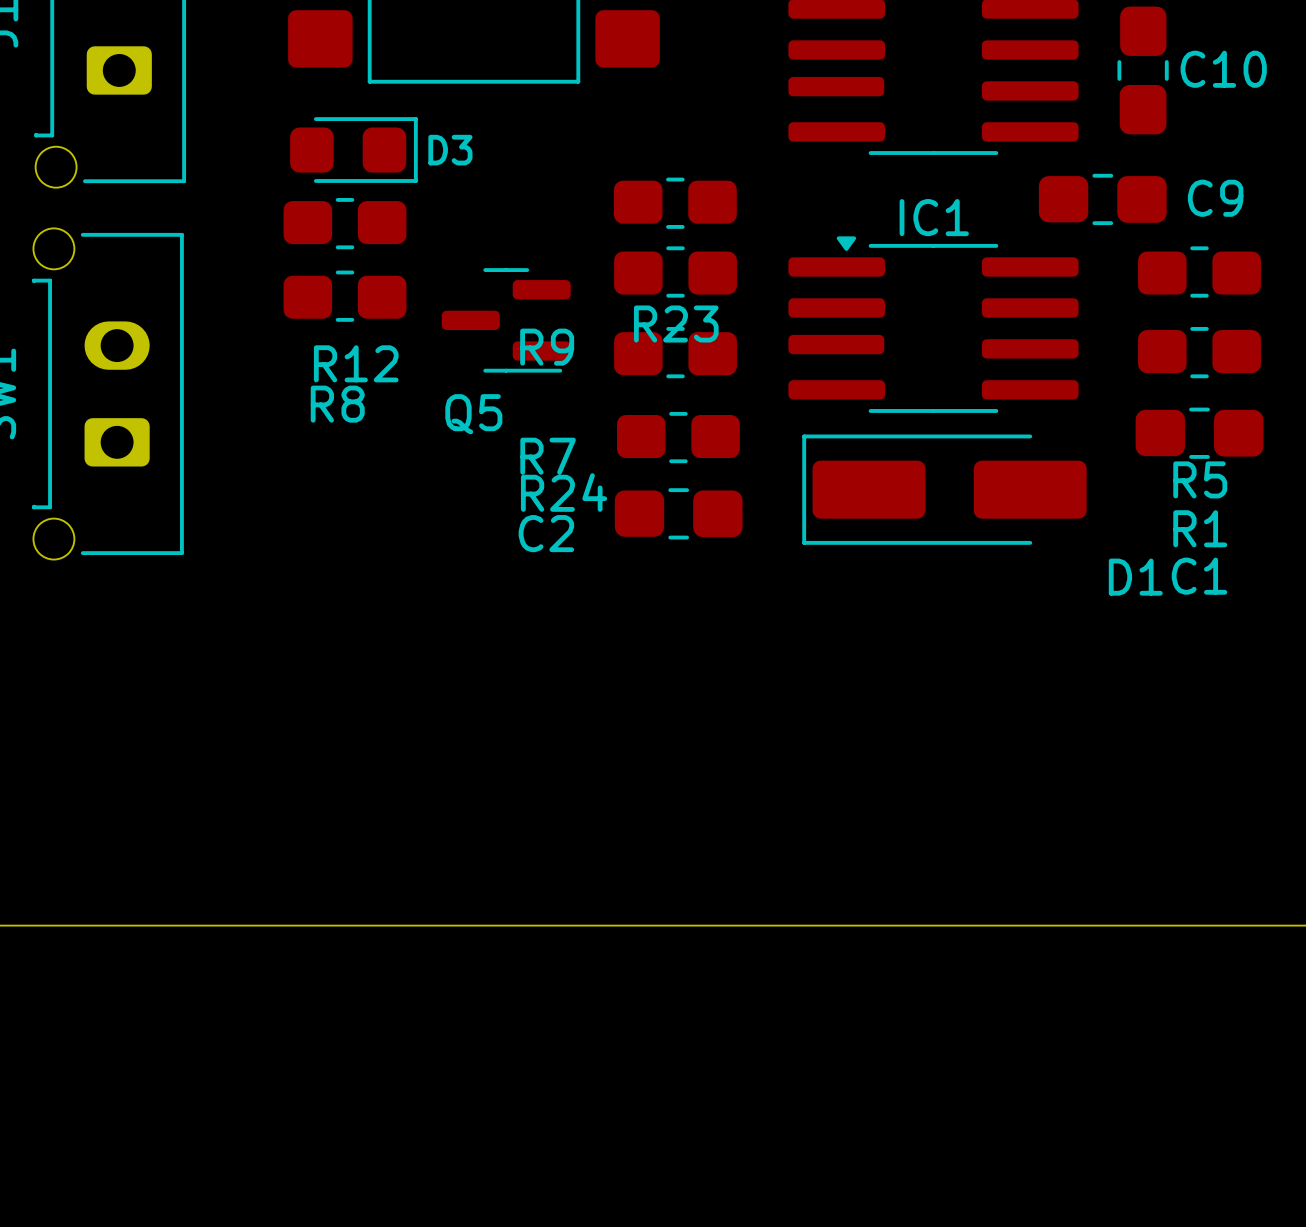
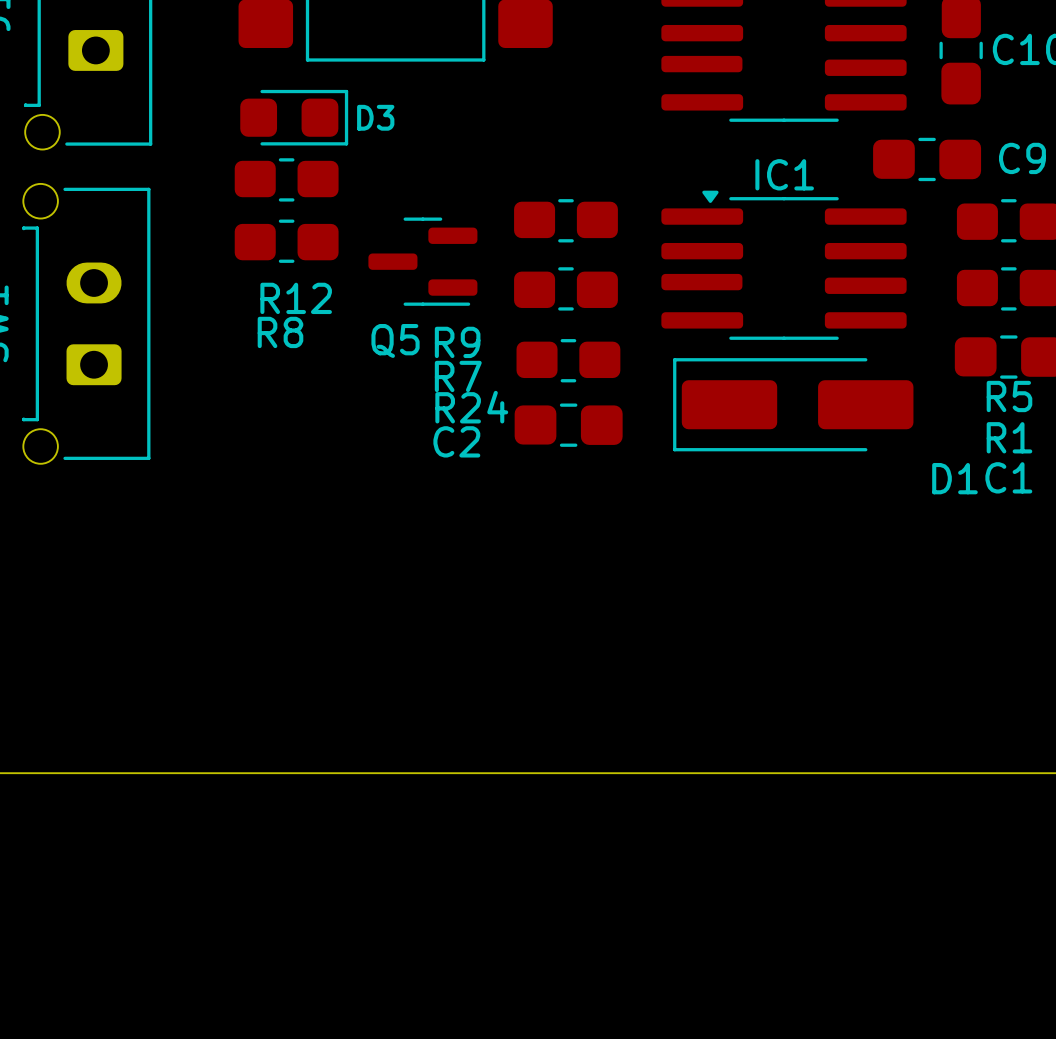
R9 position: (675, 203) -> (565, 220)
R23: (675, 272) -> none

